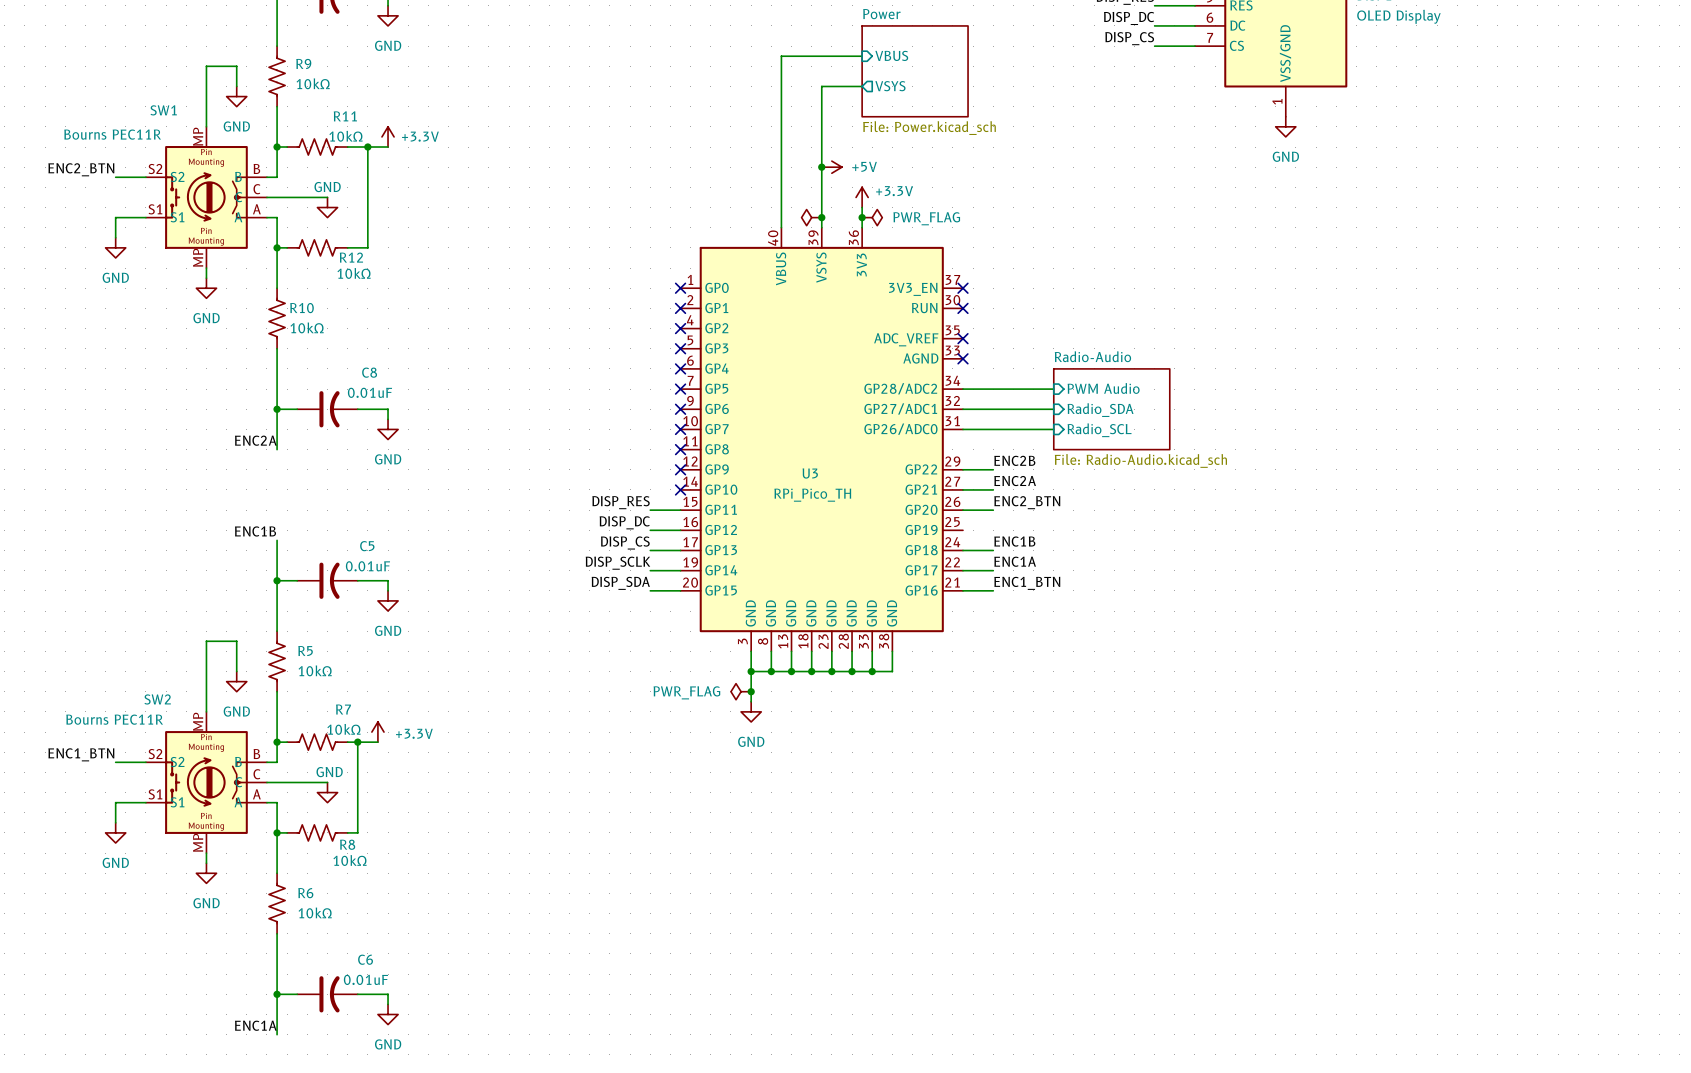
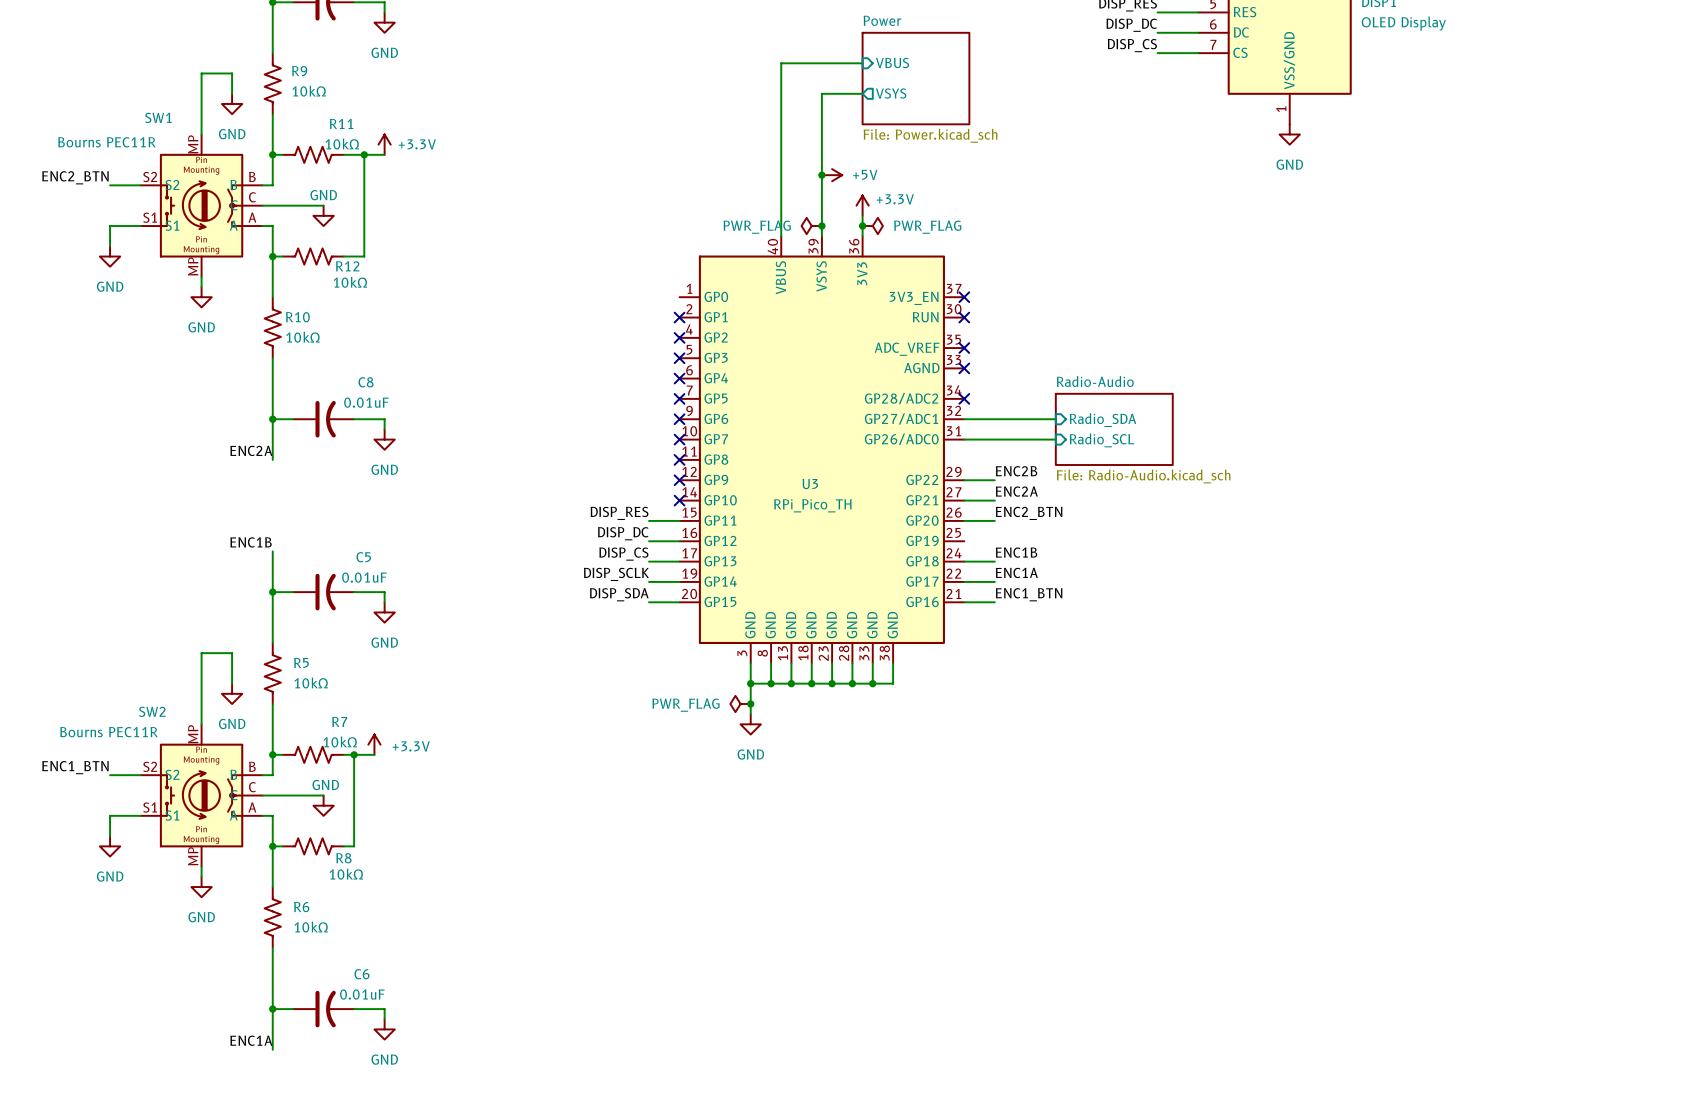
power symbol text: none -> PWR_FLAG (757, 227)
no-connect mark: (680, 288) -> none
sheet pin: PWM Audio (1103, 388) -> none
wire: (962, 389) (1053, 389) -> none
no-connect mark: none -> (964, 398)
sheet Radio-Audio: File: Radio-Audio.kicad_sch (1111, 409) -> none
sheet Radio-Audio: none -> File: Radio-Audio.kicad_sch (1114, 429)

